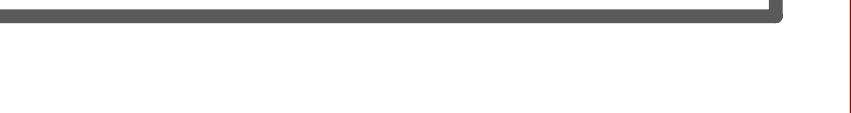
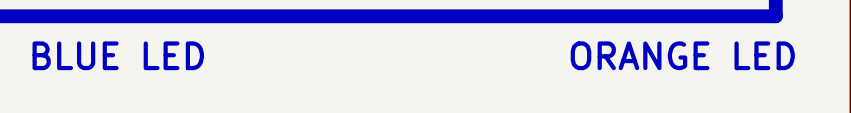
text: none -> BLUE LED (118, 55)
text: none -> ORANGE LED (682, 55)

